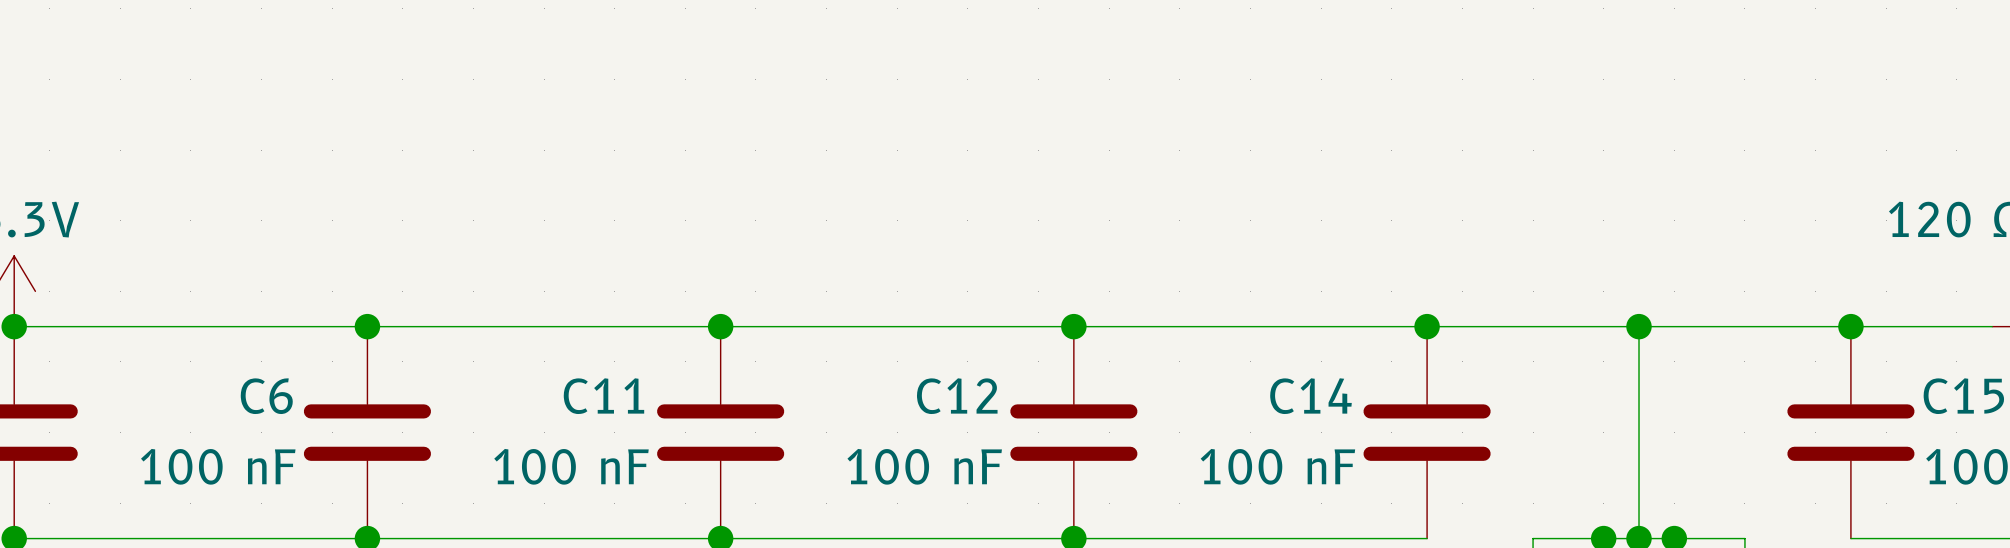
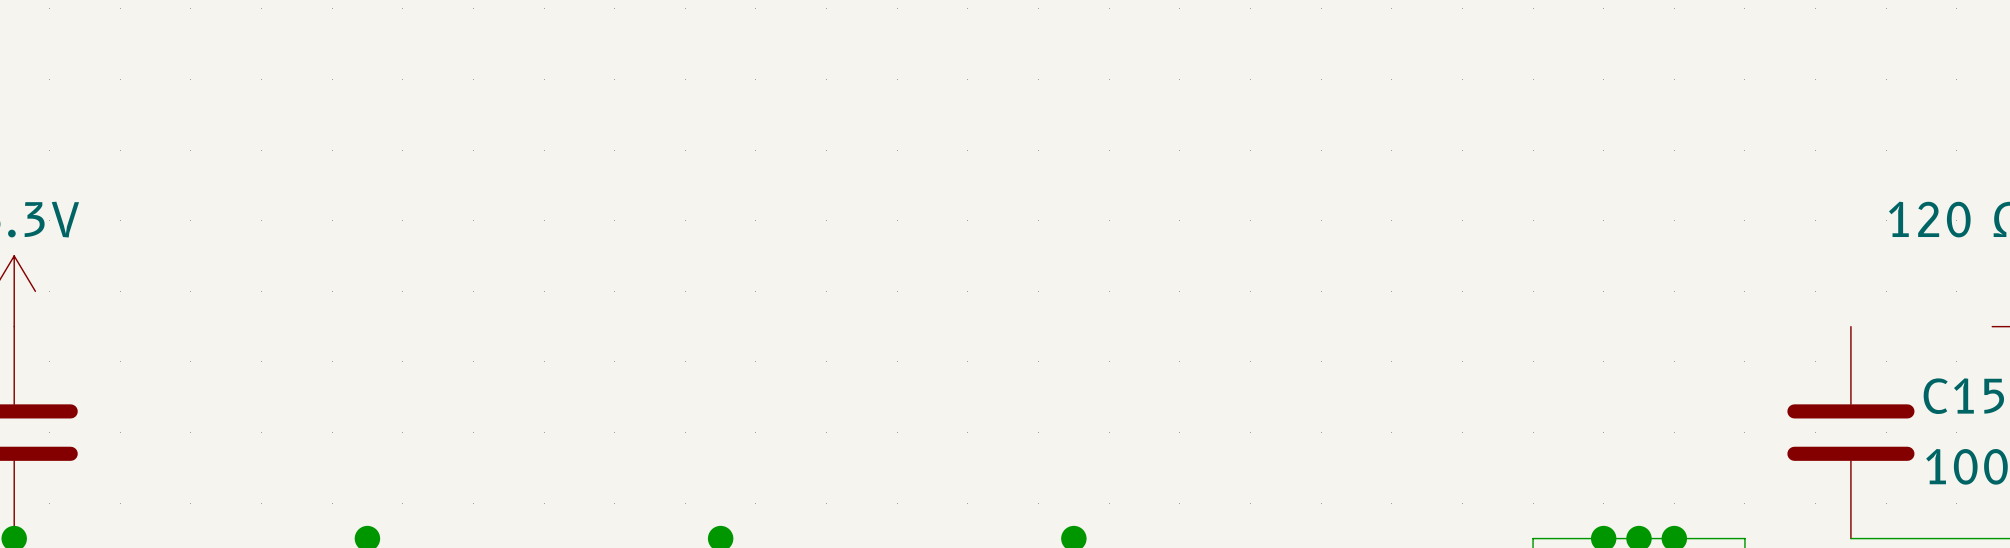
wire: (14, 326) (1992, 326) -> none
junction: (14, 326) -> none
junction: (367, 326) -> none
junction: (720, 326) -> none
junction: (1073, 326) -> none
junction: (1427, 326) -> none
wire: (1639, 326) (1639, 538) -> none
junction: (1639, 326) -> none
junction: (1850, 326) -> none
C6: 100 nF (367, 432) -> none
C11: 100 nF (720, 432) -> none
C12: 100 nF (1073, 432) -> none
C14: 100 nF (1427, 432) -> none
wire: (14, 538) (1427, 538) -> none

